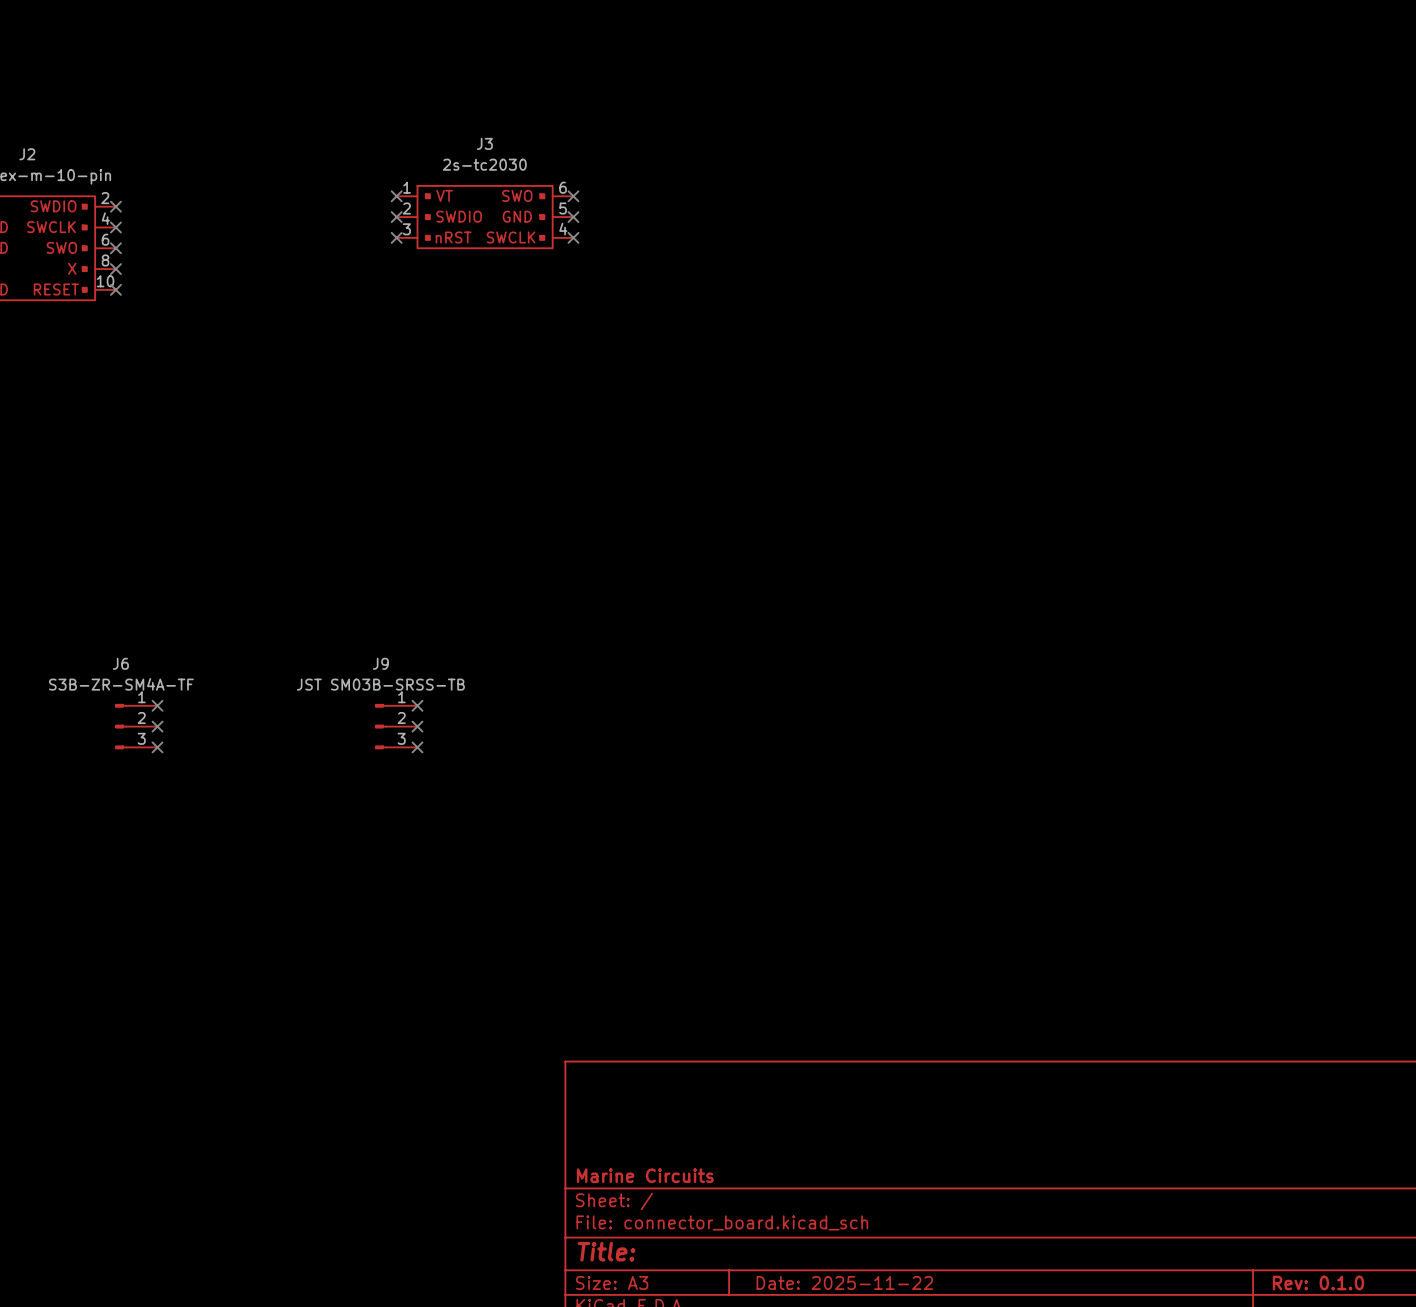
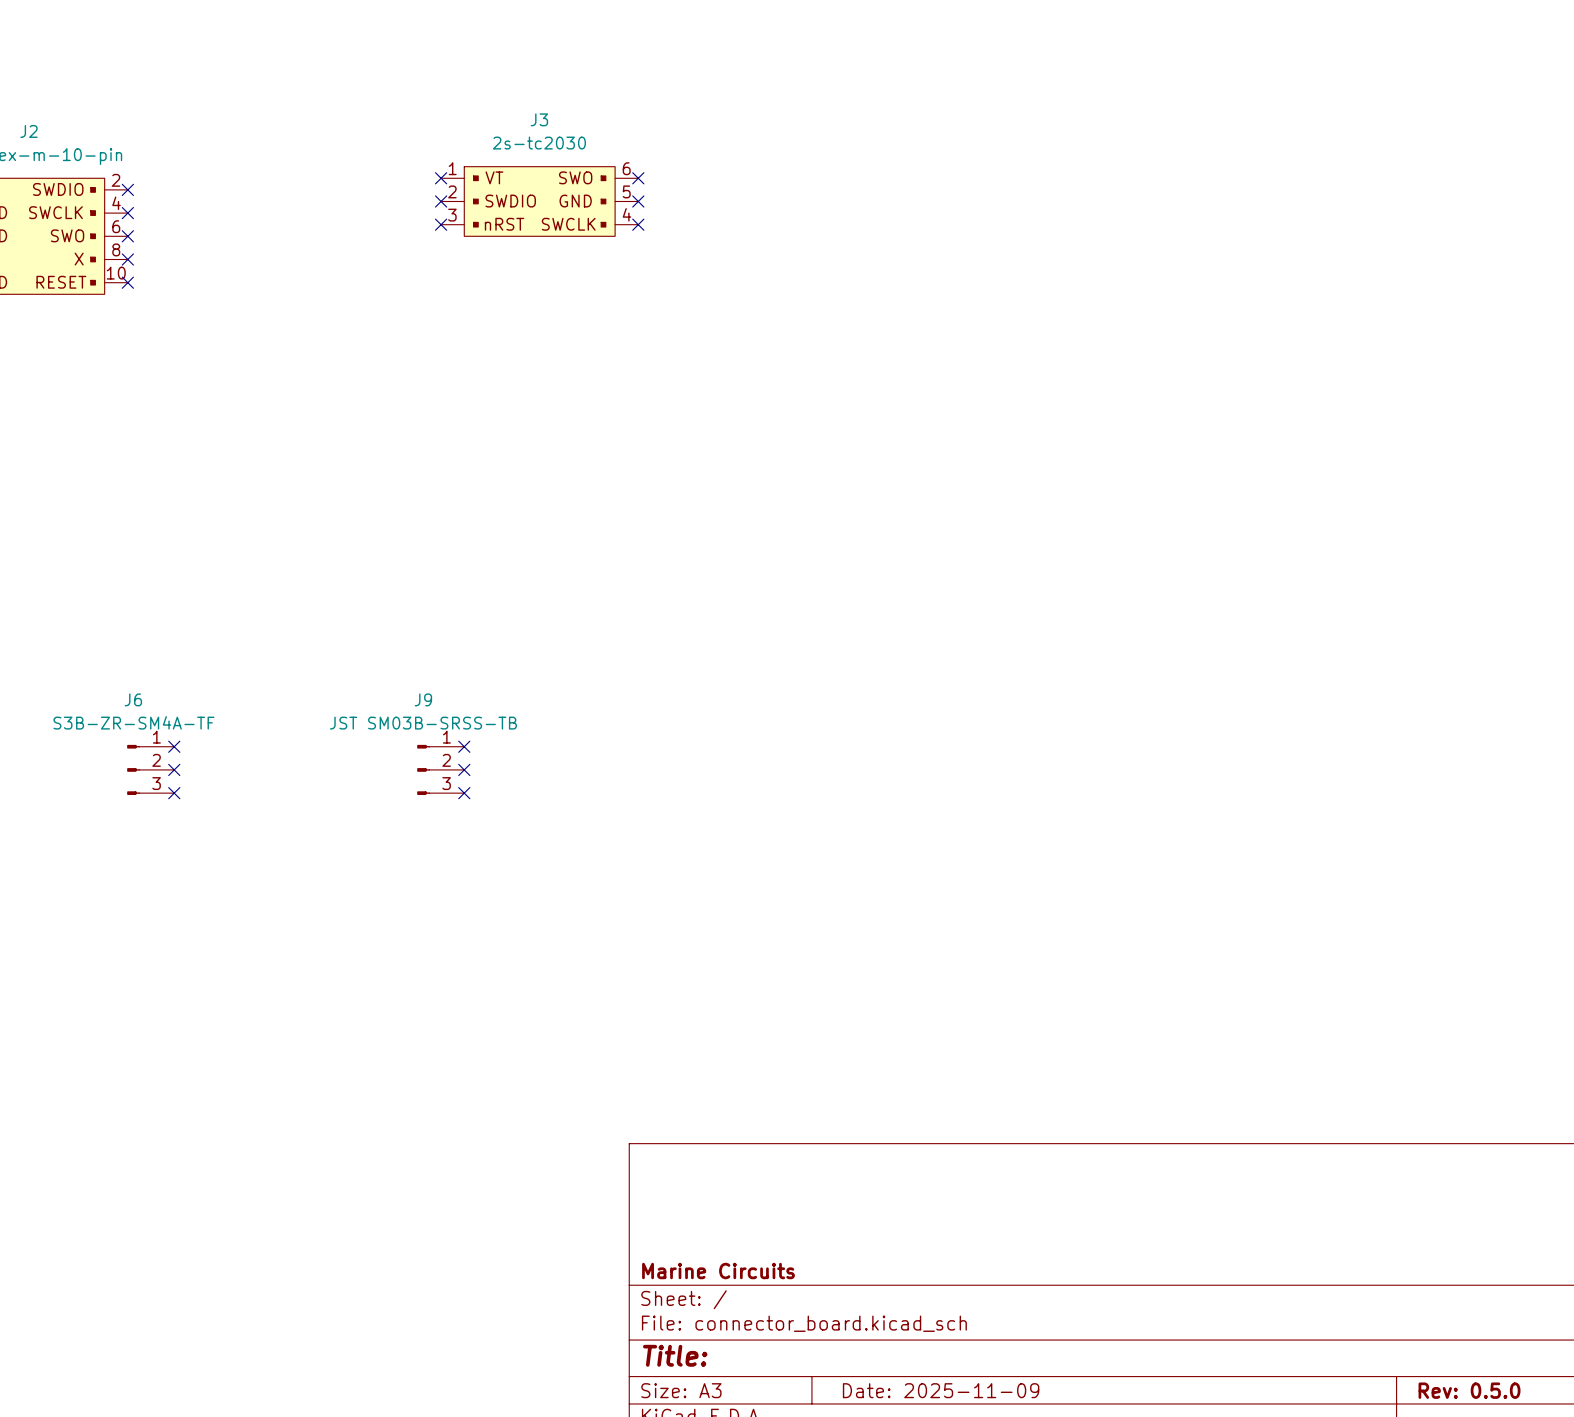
title block: Date: 2025-11-22 (844, 1282) -> Date: 2025-11-09 (941, 1390)
title block: Rev: 0.1.0 (1318, 1282) -> Rev: 0.5.0 (1469, 1390)

